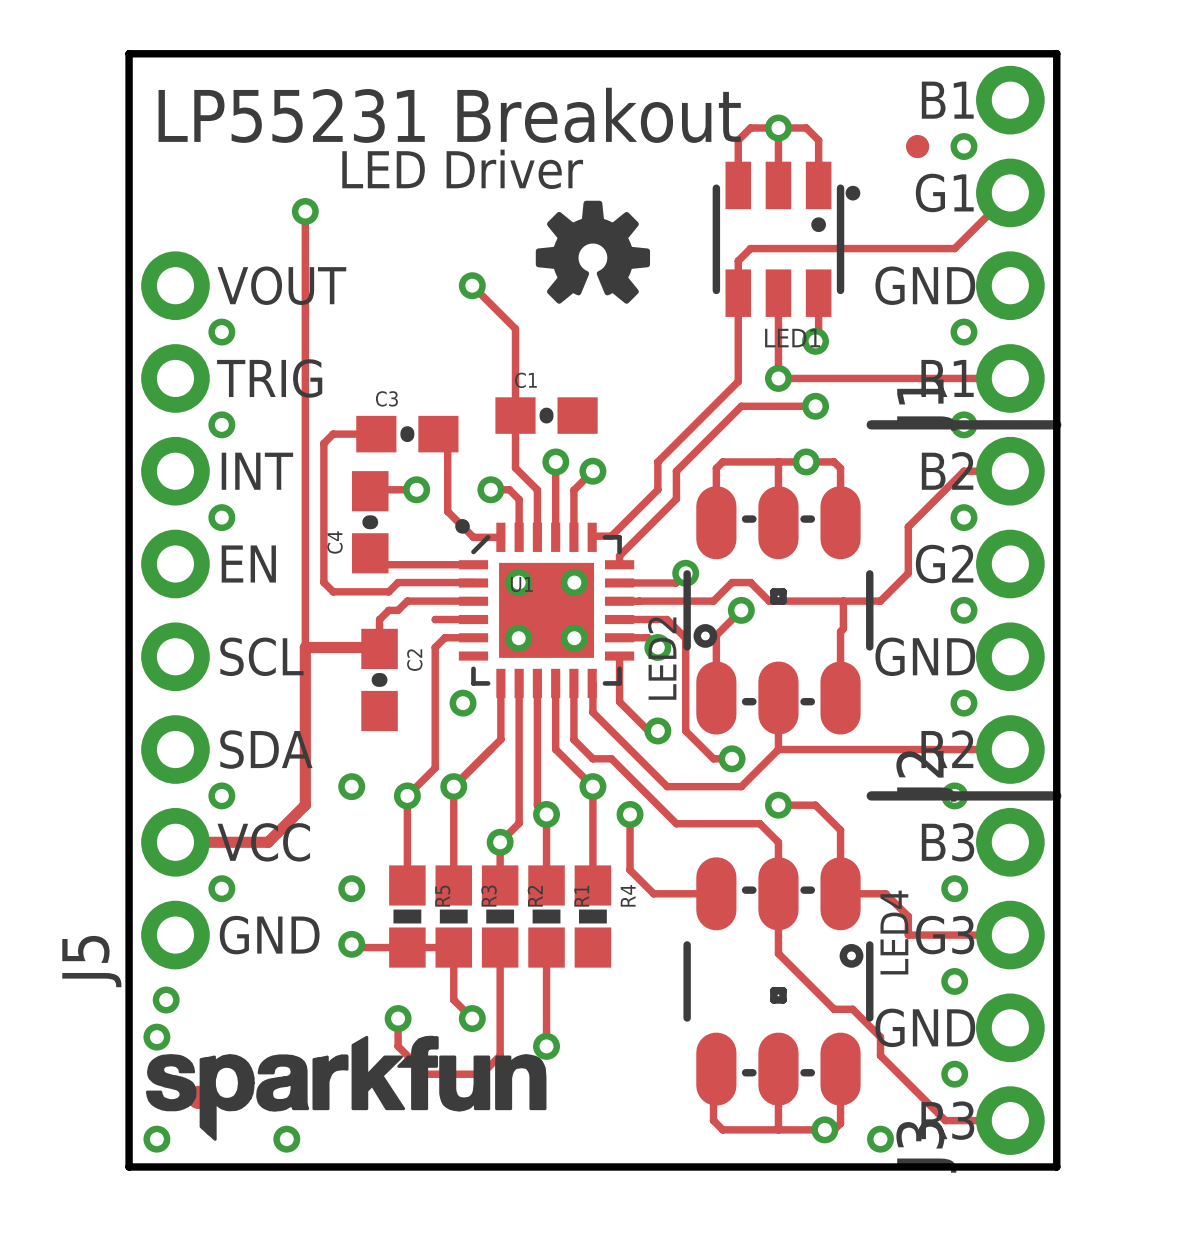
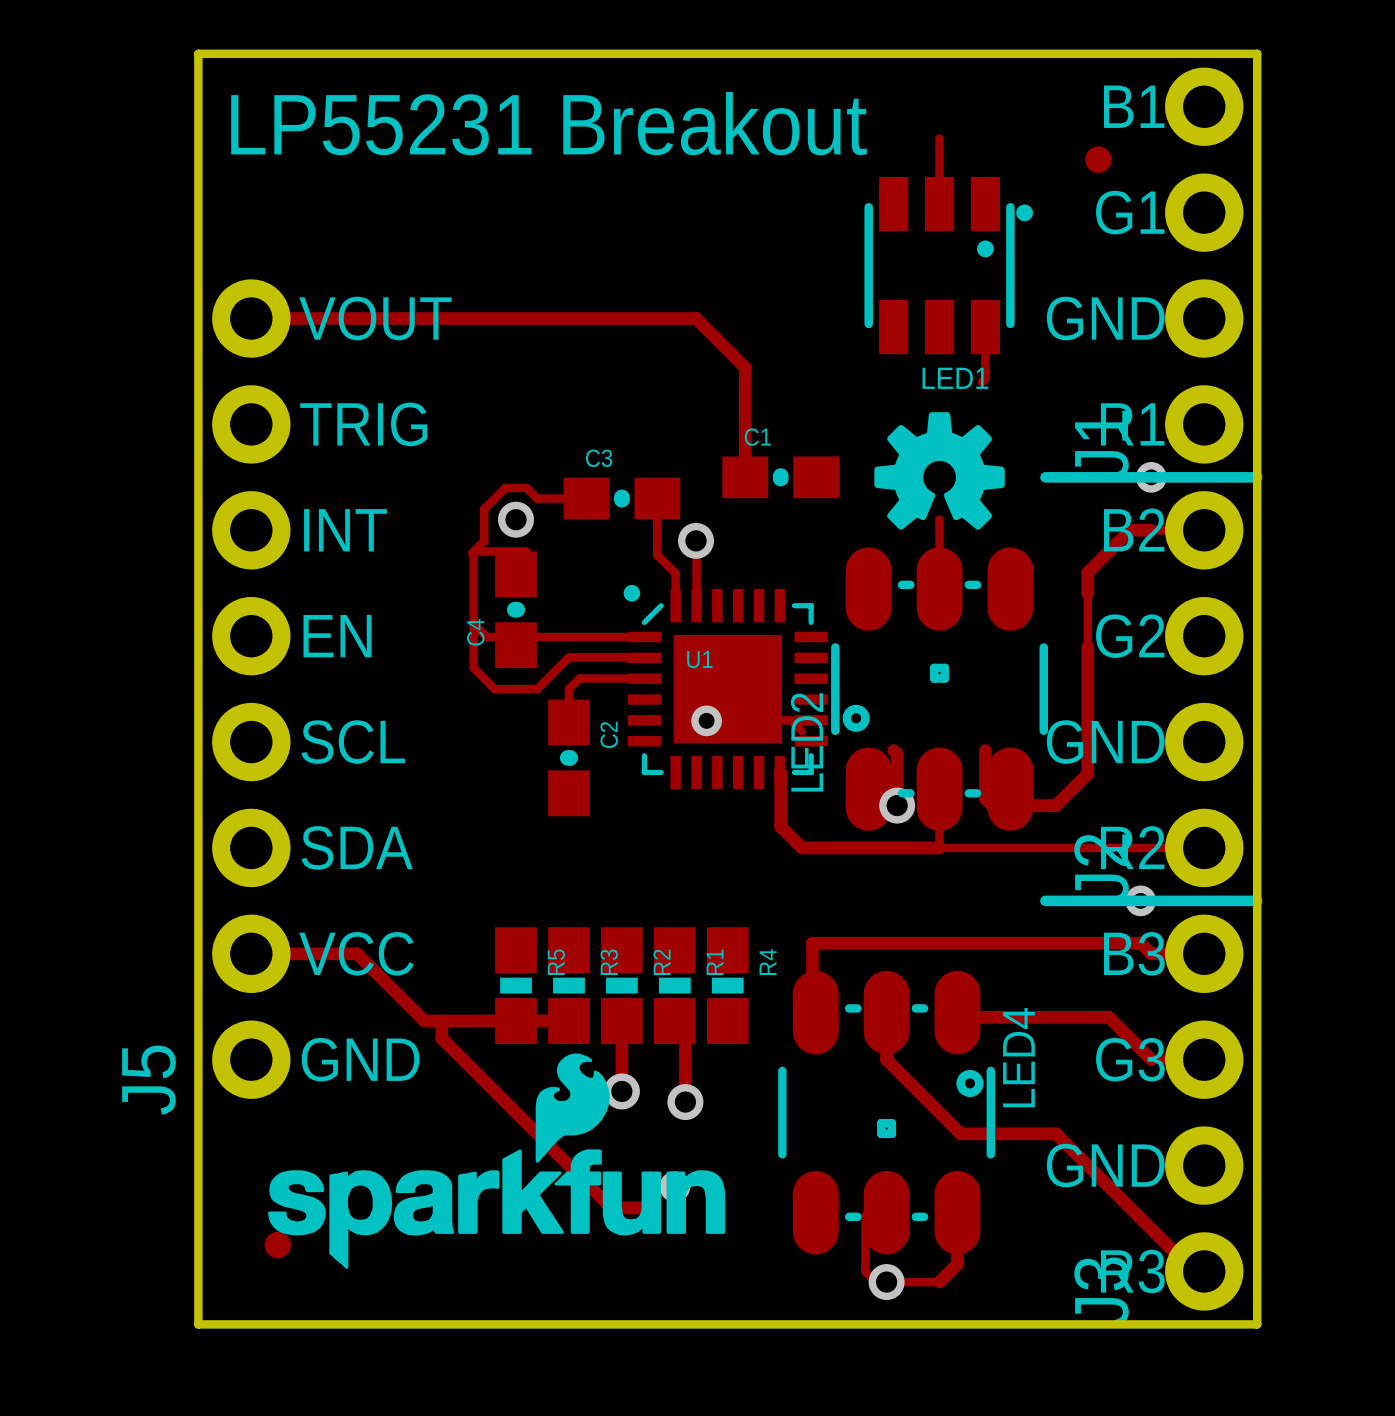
via: (778, 127) -> none
via: (963, 146) -> none
text: LED Driver (462, 169) -> none
track: (738, 185) (738, 140) (750, 127) (806, 127) (818, 140) (818, 185) -> none
track: (1010, 192) (954, 248) (750, 248) (738, 260) (738, 381) (657, 461) (657, 489) (611, 536) (592, 537) -> none
track: (305, 211) (305, 647) -> none
via: (305, 211) -> none
drawing position: (592, 252) -> (939, 470)
track: none -> (251, 318) (696, 318) (745, 367) (745, 477)
track: (472, 285) (515, 328) (515, 468) (537, 489) (537, 537) -> none
via: (472, 285) -> none
track: (778, 293) (778, 378) (1010, 378) -> none
via: (221, 332) -> none
via: (963, 332) -> none
via: (815, 341) -> none
via: (778, 378) -> none
track: (815, 406) (741, 406) (676, 471) (676, 499) (619, 555) (619, 564) -> none
via: (815, 406) -> none
C1 position: (546, 415) -> (780, 477)
via: (221, 424) -> none
track: (376, 434) (333, 434) (323, 443) (323, 582) (333, 591) (388, 591) (398, 582) (453, 582) -> none
C3 position: (407, 434) -> (621, 498)
track: (438, 434) (444, 434) (447, 437) (447, 511) (473, 537) (500, 537) -> none
track: none -> (657, 498) (657, 555) (675, 573) (675, 605)
via: (555, 461) -> none
via: (806, 461) -> none
track: (555, 462) (555, 537) -> none
track: (592, 471) (573, 490) (573, 537) -> none
via: (592, 471) -> none
track: (963, 471) (908, 526) -> (1151, 530) (1130, 530) (1087, 572) (1087, 593)
track: none -> (696, 541) (696, 605)
via: none -> (696, 540)
via position: (416, 489) -> (516, 519)
track: (490, 489) (509, 489) (519, 499) (519, 537) -> none
via: (490, 489) -> none
via: (221, 517) -> none
via: (963, 517) -> none
C4 position: (370, 522) -> (516, 609)
track: (716, 522) (716, 468) (722, 461) (834, 461) (840, 468) (840, 522) -> none
track: none -> (591, 637) (644, 637)
track: (685, 573) (675, 582) (619, 582) -> none
via: (685, 573) -> none
track: (908, 573) (880, 601) (769, 601) (750, 582) (732, 582) (713, 601) (619, 601) -> (1087, 646) (1087, 773) (1056, 805) (992, 805) (985, 798) (985, 750)
track: none -> (590, 657) (644, 657)
via: (518, 582) -> none
via: (574, 582) -> none
track: (463, 601) (407, 601) (398, 610) -> (568, 657) (537, 689) (505, 689)
track: none -> (579, 678) (568, 689) (568, 722)
track: none -> (591, 678) (644, 678)
track: (843, 601) (843, 628) (840, 631) (840, 698) -> none
U1 position: (544, 608) -> (725, 687)
track: (388, 610) (379, 619) (379, 648) -> (494, 689) (473, 667) (473, 551) (484, 540) (484, 509) (505, 487) (526, 487) (537, 498) (586, 498)
track: (741, 610) (716, 635) (716, 698) -> none
via: (741, 610) -> none
via: (963, 610) -> none
track: (435, 619) (473, 619) -> none
track: (619, 619) (666, 619) (685, 638) (685, 730) (713, 758) (732, 758) -> none
track: (473, 637) (444, 637) (435, 647) (435, 768) (407, 795) (407, 885) -> none
via: (518, 638) -> none
track: (305, 647) (305, 805) (268, 842) -> (568, 1021) (424, 1021) (357, 953)
track: (305, 647) (379, 647) -> none
via: (657, 647) -> none
track: (619, 656) (619, 701) (648, 730) (657, 730) -> none
track: none -> (893, 750) (897, 754) (897, 805)
C2 position: (379, 679) -> (568, 757)
track: (500, 683) (500, 739) (453, 786) (453, 885) -> none
track: (519, 683) (519, 823) (500, 842) (500, 885) -> none
track: (537, 683) (537, 805) (546, 814) (546, 885) -> none
track: (555, 683) (555, 749) (592, 786) (592, 885) -> none
track: (573, 683) (573, 739) (592, 758) (611, 758) (676, 823) (759, 823) (778, 842) (778, 953) (834, 1009) (852, 1009) (880, 1037) (880, 1055) (945, 1120) (1001, 1120) -> (886, 1012) (886, 1059) (960, 1133) (1056, 1133) (1193, 1271)
track: (592, 683) (592, 712) (667, 786) (741, 786) (778, 749) -> (779, 772) (780, 826) (801, 847) (939, 847)
via: (463, 703) -> none
via: (963, 703) -> none
via: none -> (897, 805)
via: (657, 730) -> none
via: (732, 758) -> none
via: (351, 786) -> none
via: (453, 786) -> none
via: (592, 786) -> none
via: (221, 795) -> none
via: (407, 795) -> none
track: (778, 805) (815, 805) (840, 830) (840, 893) (885, 893) (908, 916) (908, 935) (963, 935) -> (960, 1017) (1108, 1017) (1151, 1059)
via: (778, 805) -> none
via: (546, 814) -> none
track: (630, 814) (630, 870) (653, 893) (716, 893) -> none
via: (630, 814) -> none
via: (500, 842) -> none
track: none -> (1204, 953) (1151, 953) (1140, 943) (812, 943) (812, 1006) (815, 1012)
via: (221, 888) -> none
via: (351, 888) -> none
via: (954, 888) -> none
track: none -> (441, 1021) (441, 1038) (611, 1207) (643, 1207)
track: none -> (621, 1021) (621, 1073)
track: none -> (674, 1021) (685, 1031) (685, 1102)
R5 position: (407, 916) -> (516, 985)
R3 position: (453, 916) -> (568, 985)
R2 position: (500, 916) -> (621, 985)
R1 position: (546, 916) -> (674, 985)
R4 position: (592, 916) -> (727, 985)
drawing: none -> [268, 1053, 726, 1269]
track: (351, 944) (354, 947) (453, 947) (453, 1000) (472, 1018) -> none
via: (351, 944) -> none
track: (546, 947) (546, 1046) -> none
track: (500, 962) (500, 1055) (481, 1074) (425, 1074) (398, 1046) (398, 1018) -> none
via: none -> (621, 1091)
via: none -> (685, 1102)
LED4 position: (778, 981) -> (886, 1112)
via: (954, 981) -> none
via: (166, 1000) -> none
via: (398, 1018) -> none
via: (472, 1018) -> none
drawing: [145, 1035, 547, 1141] -> none
via: (156, 1037) -> none
track: (778, 1069) (778, 1129) (834, 1129) (840, 1123) (840, 1069) -> none
track: none -> (957, 1212) (957, 1264) (939, 1282)
via: (954, 1074) -> none
via: none -> (886, 1282)
via: (824, 1129) -> none
via: (156, 1139) -> none
via: (286, 1139) -> none
via: (880, 1139) -> none

